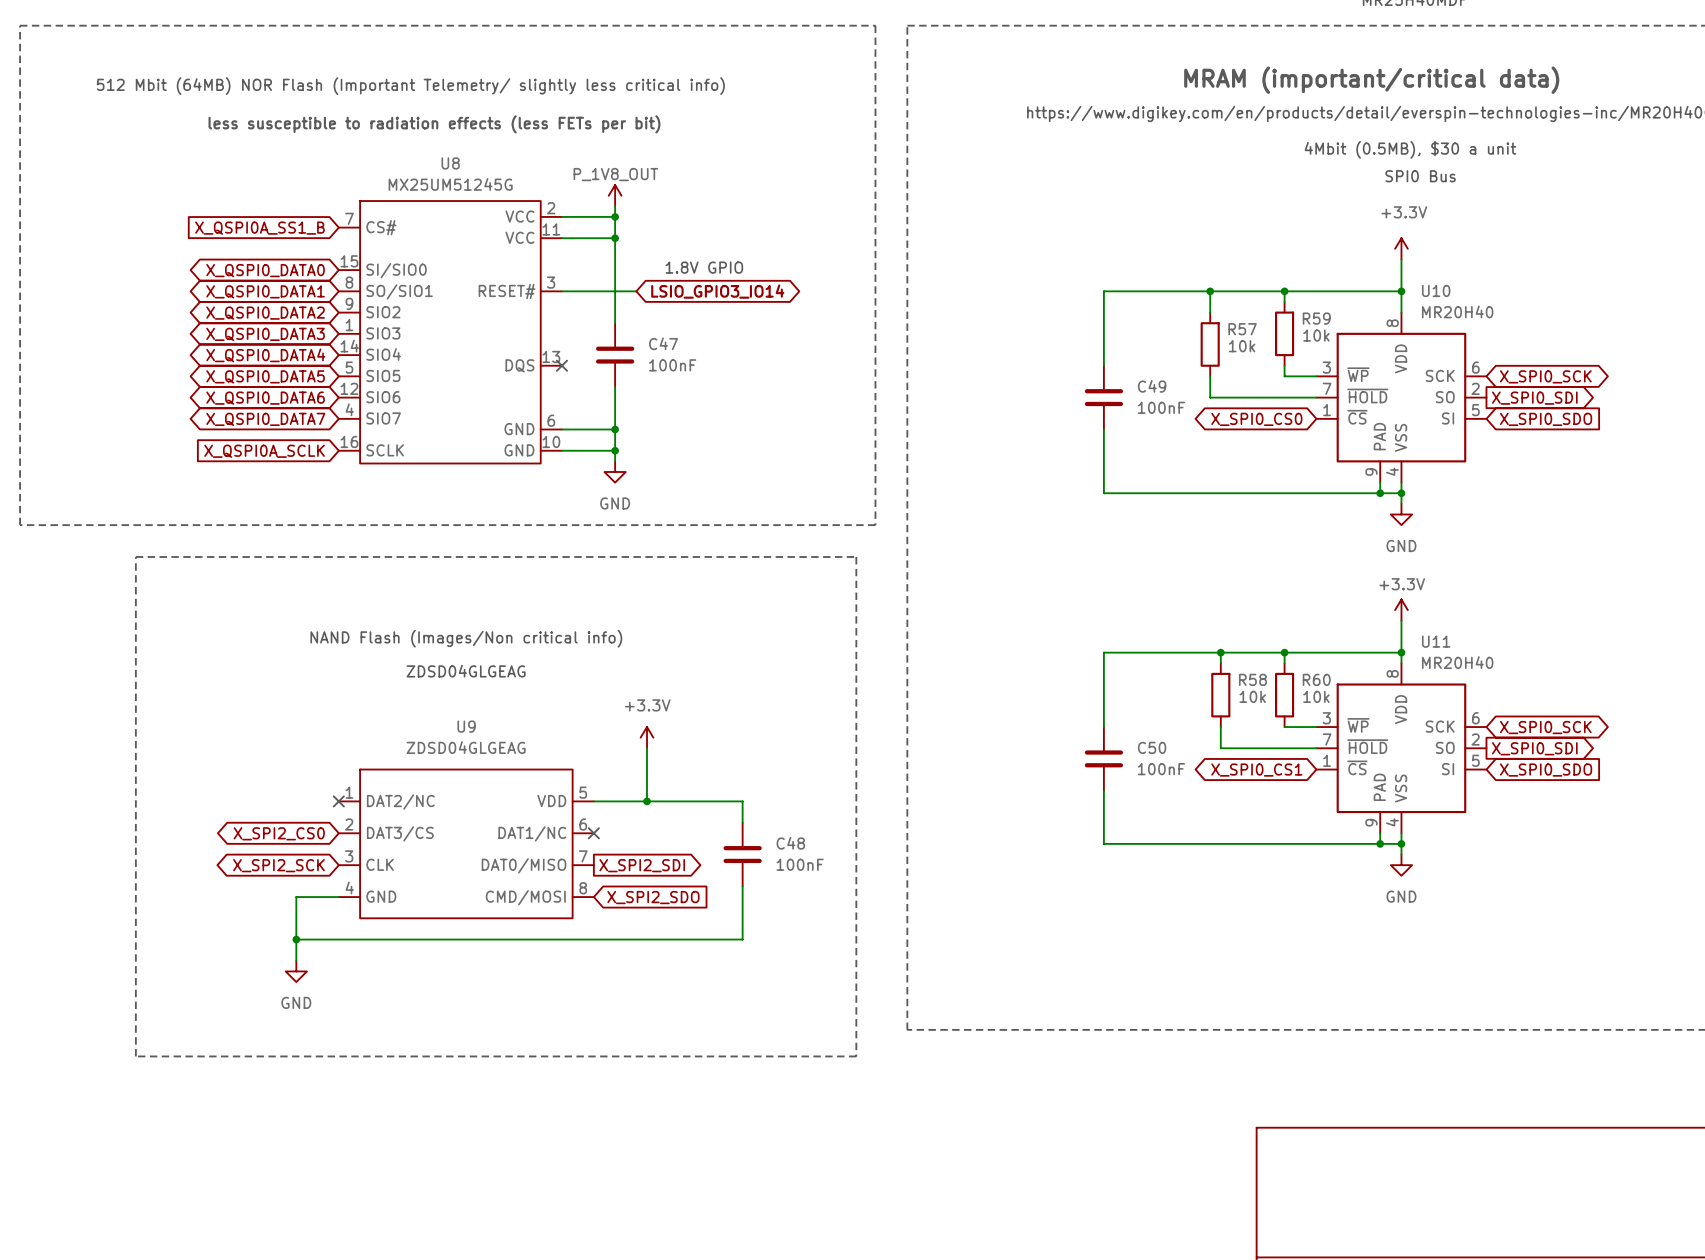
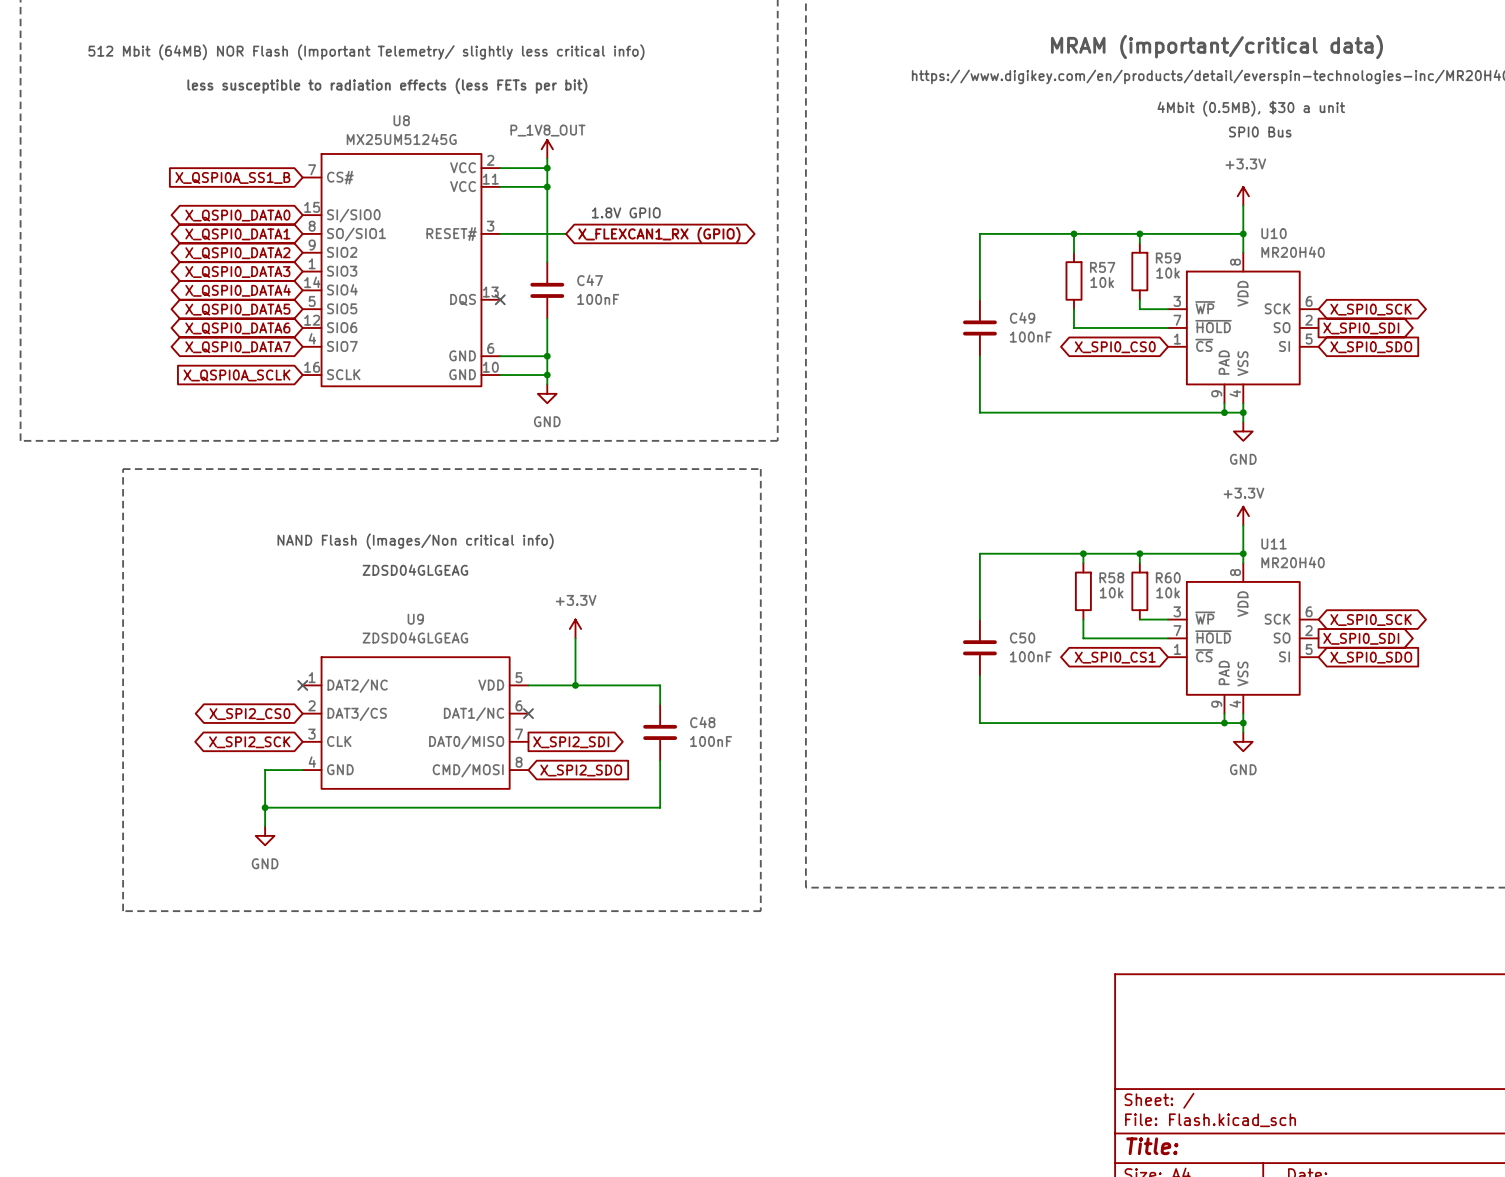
global label: LSIO_GPIO3_IO14 (717, 291) -> X_FLEXCAN1_RX (GPIO) (659, 235)

